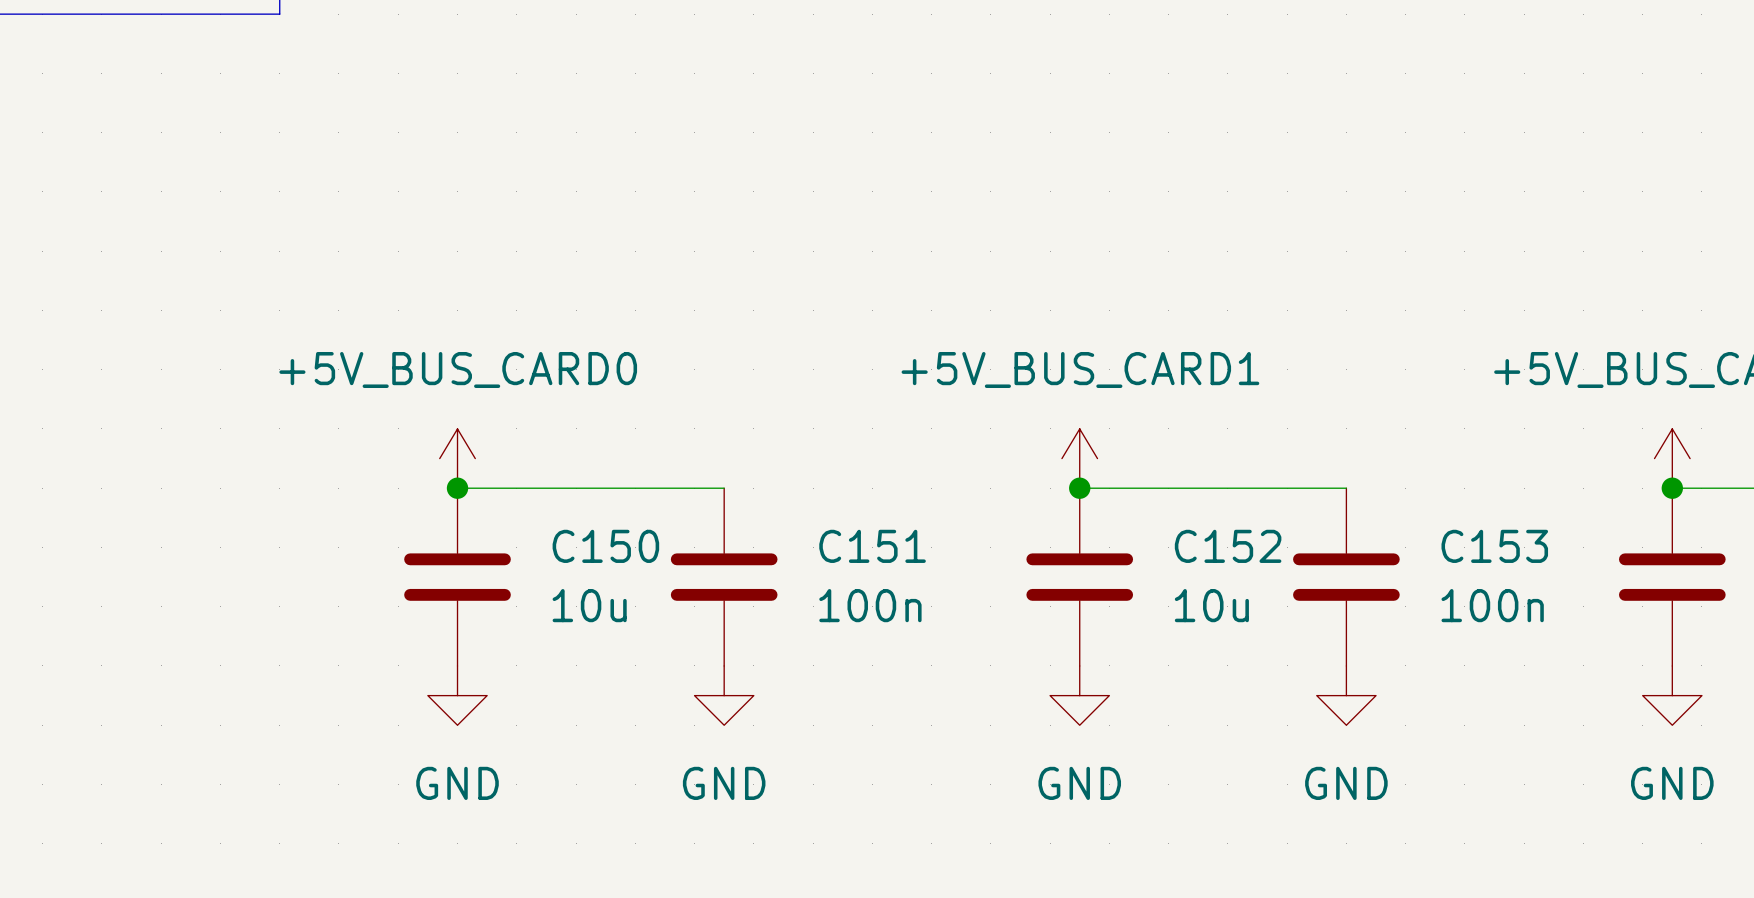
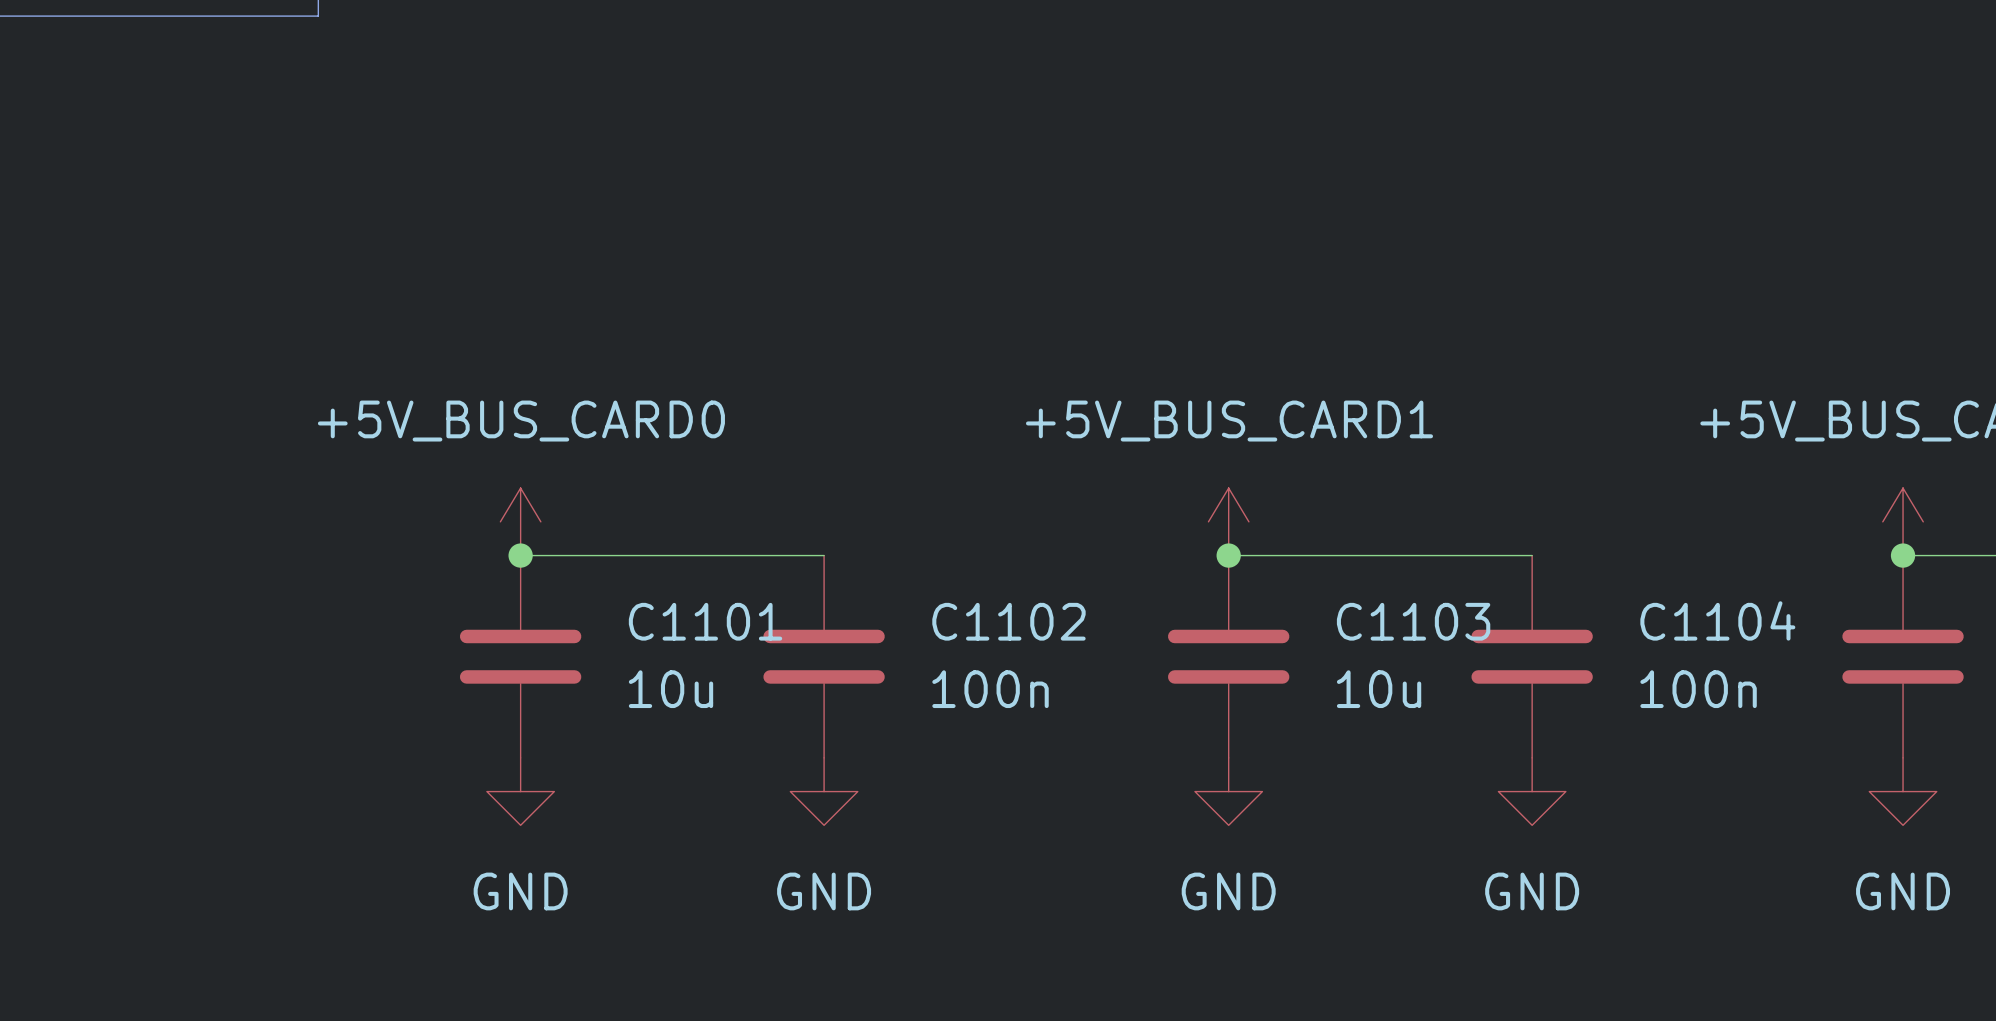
C150 name: C150 (605, 546) -> C1101 (705, 621)
C151 name: C151 (872, 546) -> C1102 (1008, 621)
C152 name: C152 (1228, 546) -> C1103 (1413, 621)
C153 name: C153 (1494, 546) -> C1104 (1717, 620)

